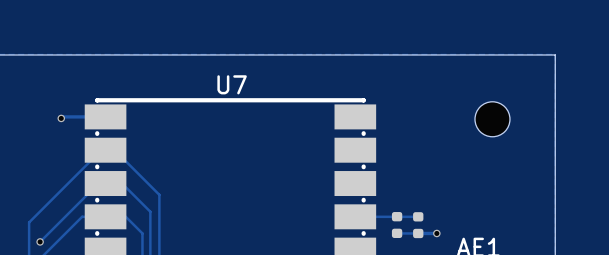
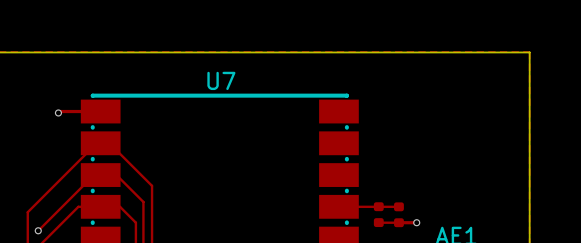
part: (492, 119) -> none

